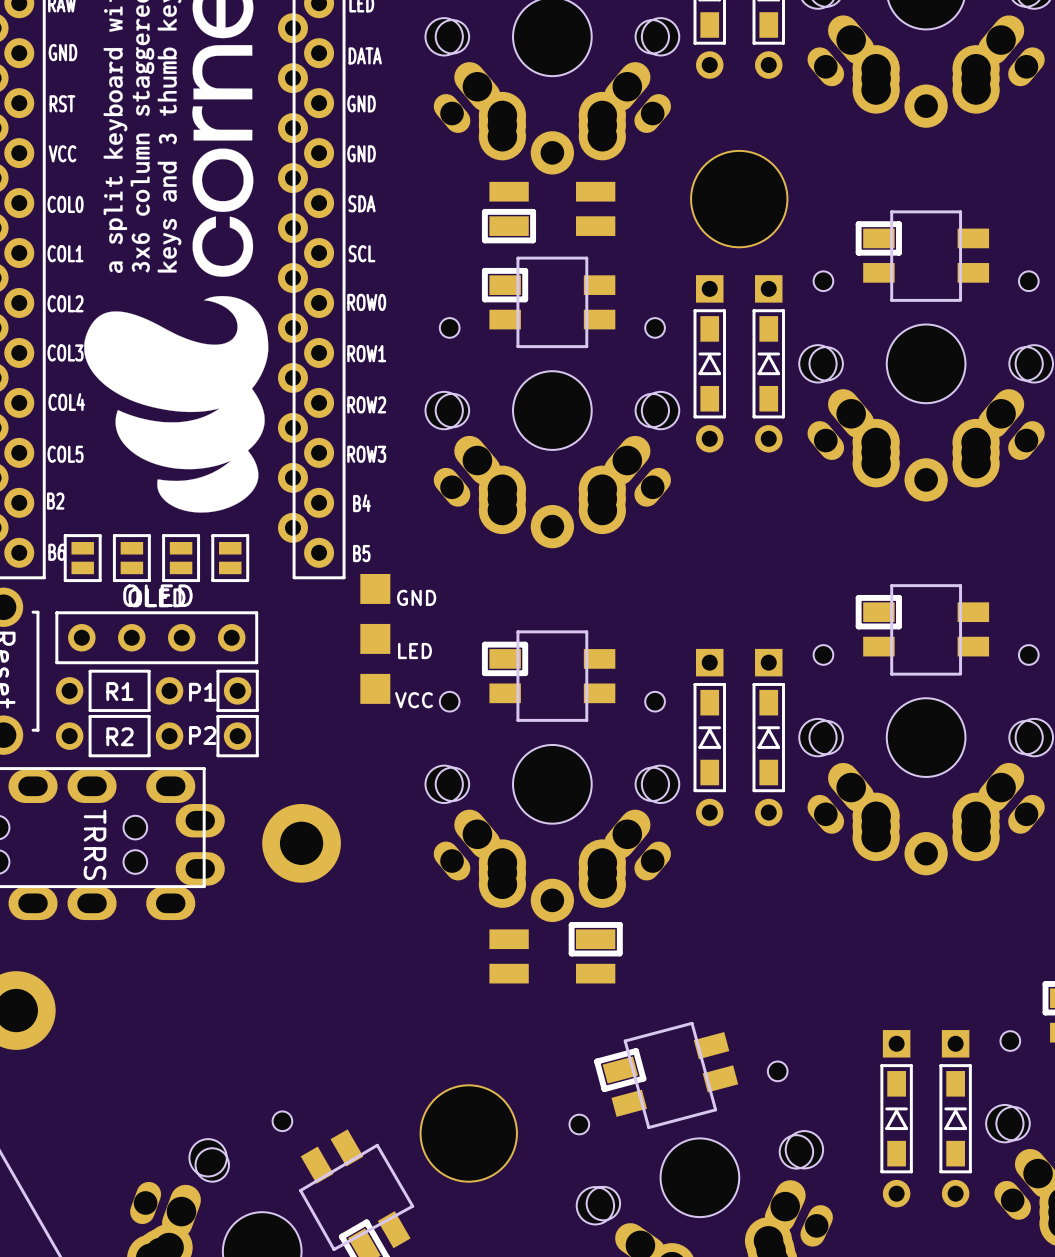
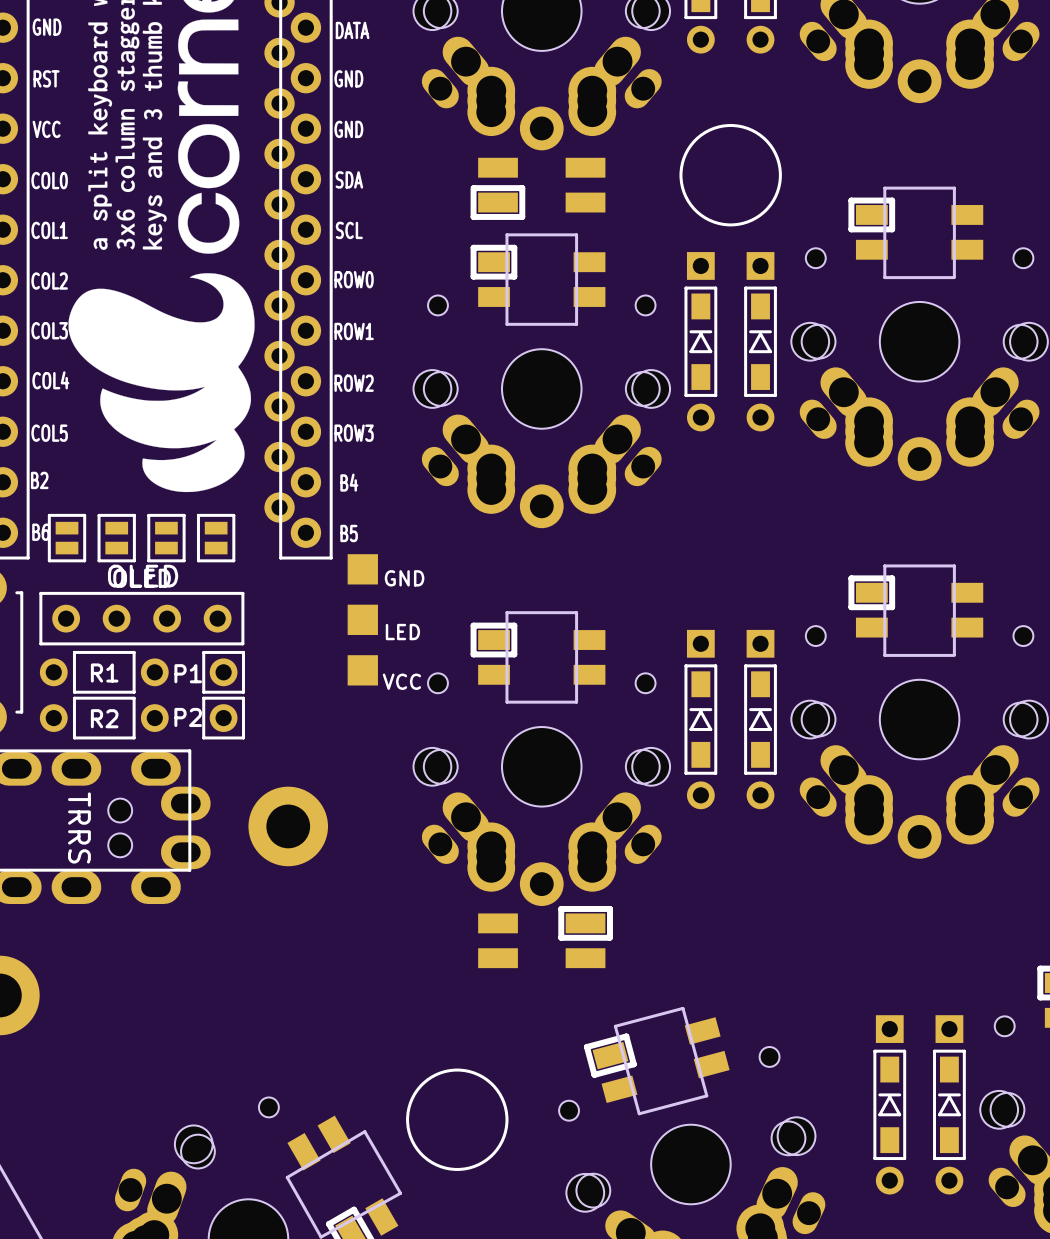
drawing: none -> [679, 123, 782, 227]
part: (739, 199) -> none
drawing: none -> [406, 1068, 509, 1171]
part: (468, 1133) -> none

